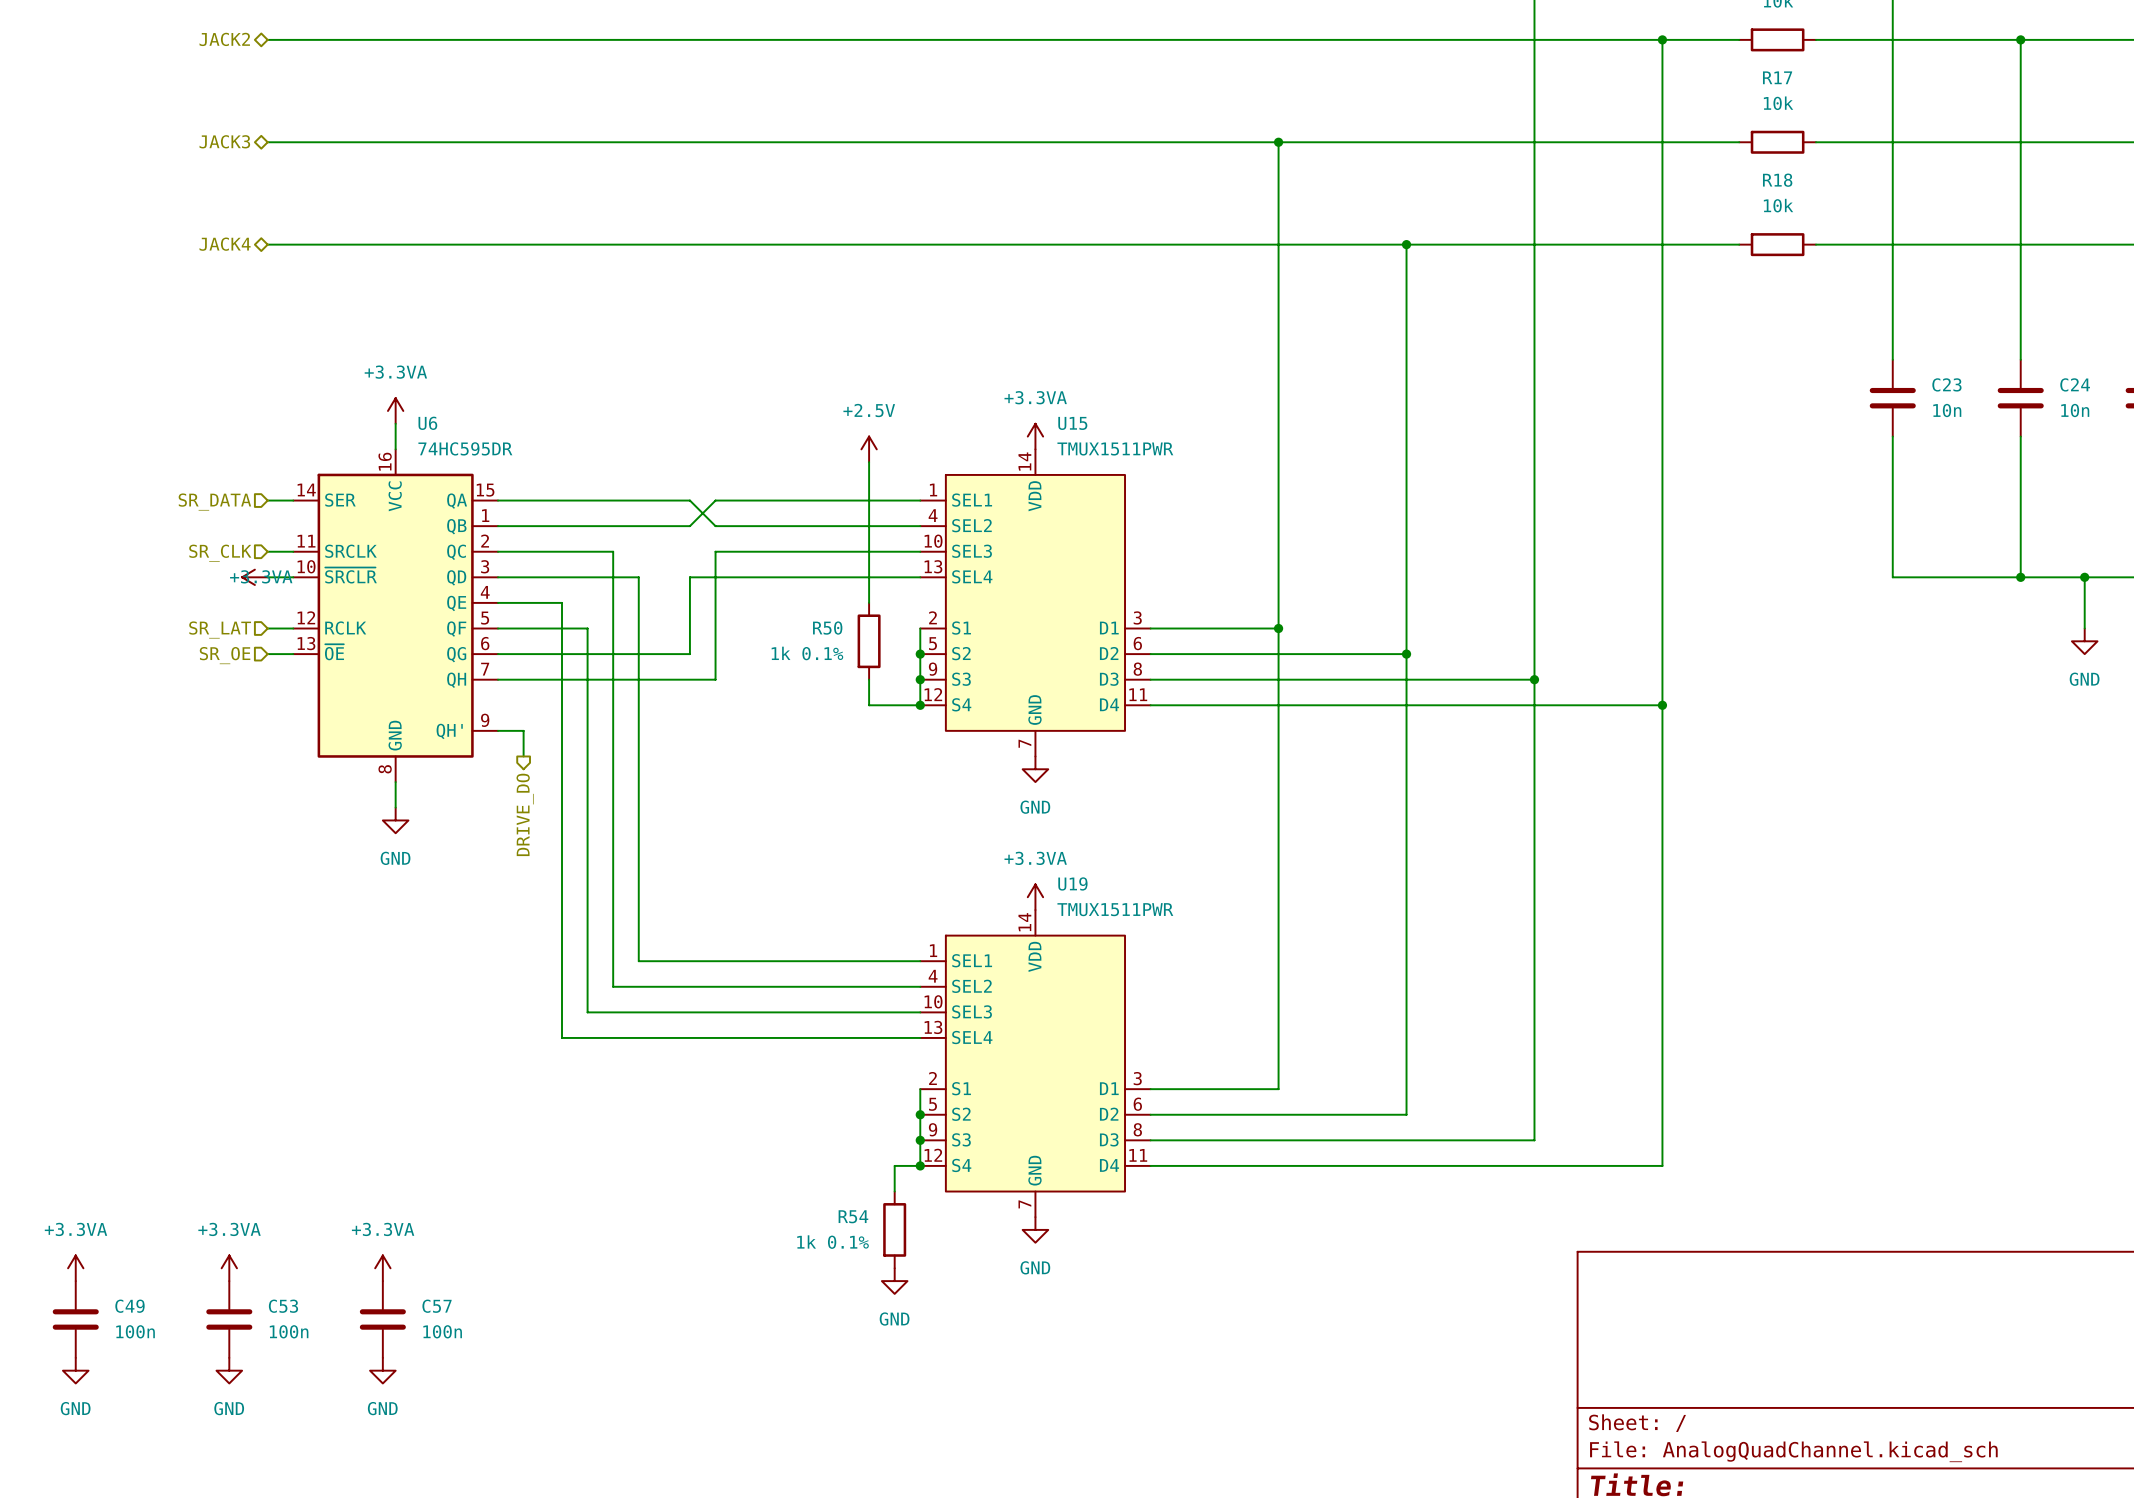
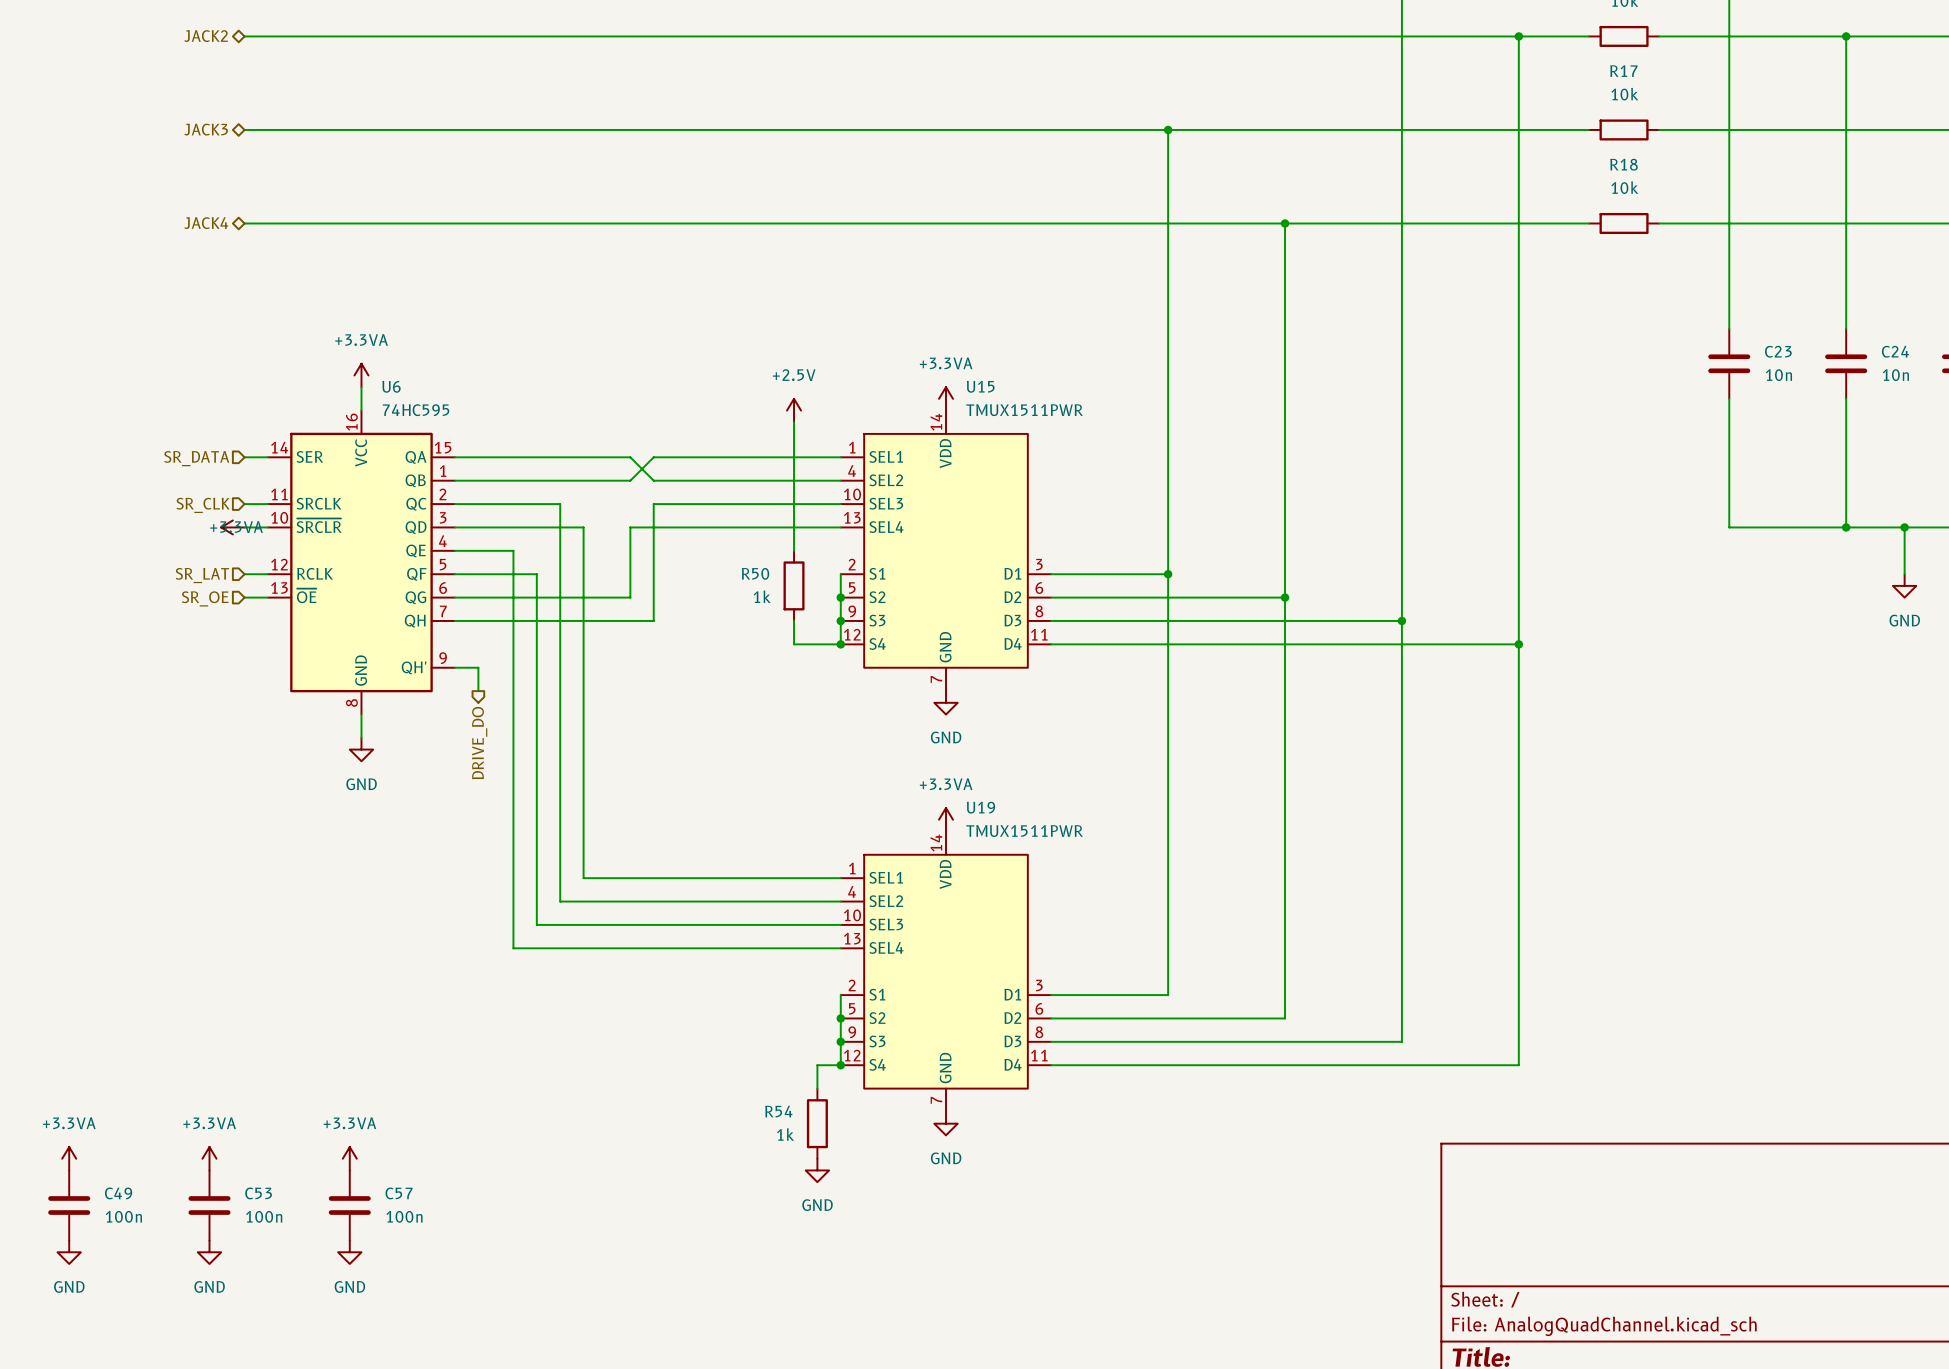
U6 value: 74HC595DR (465, 448) -> 74HC595 (416, 410)
R50 value: 1k 0.1% (807, 653) -> 1k (762, 596)
R54 value: 1k 0.1% (833, 1242) -> 1k (785, 1134)

